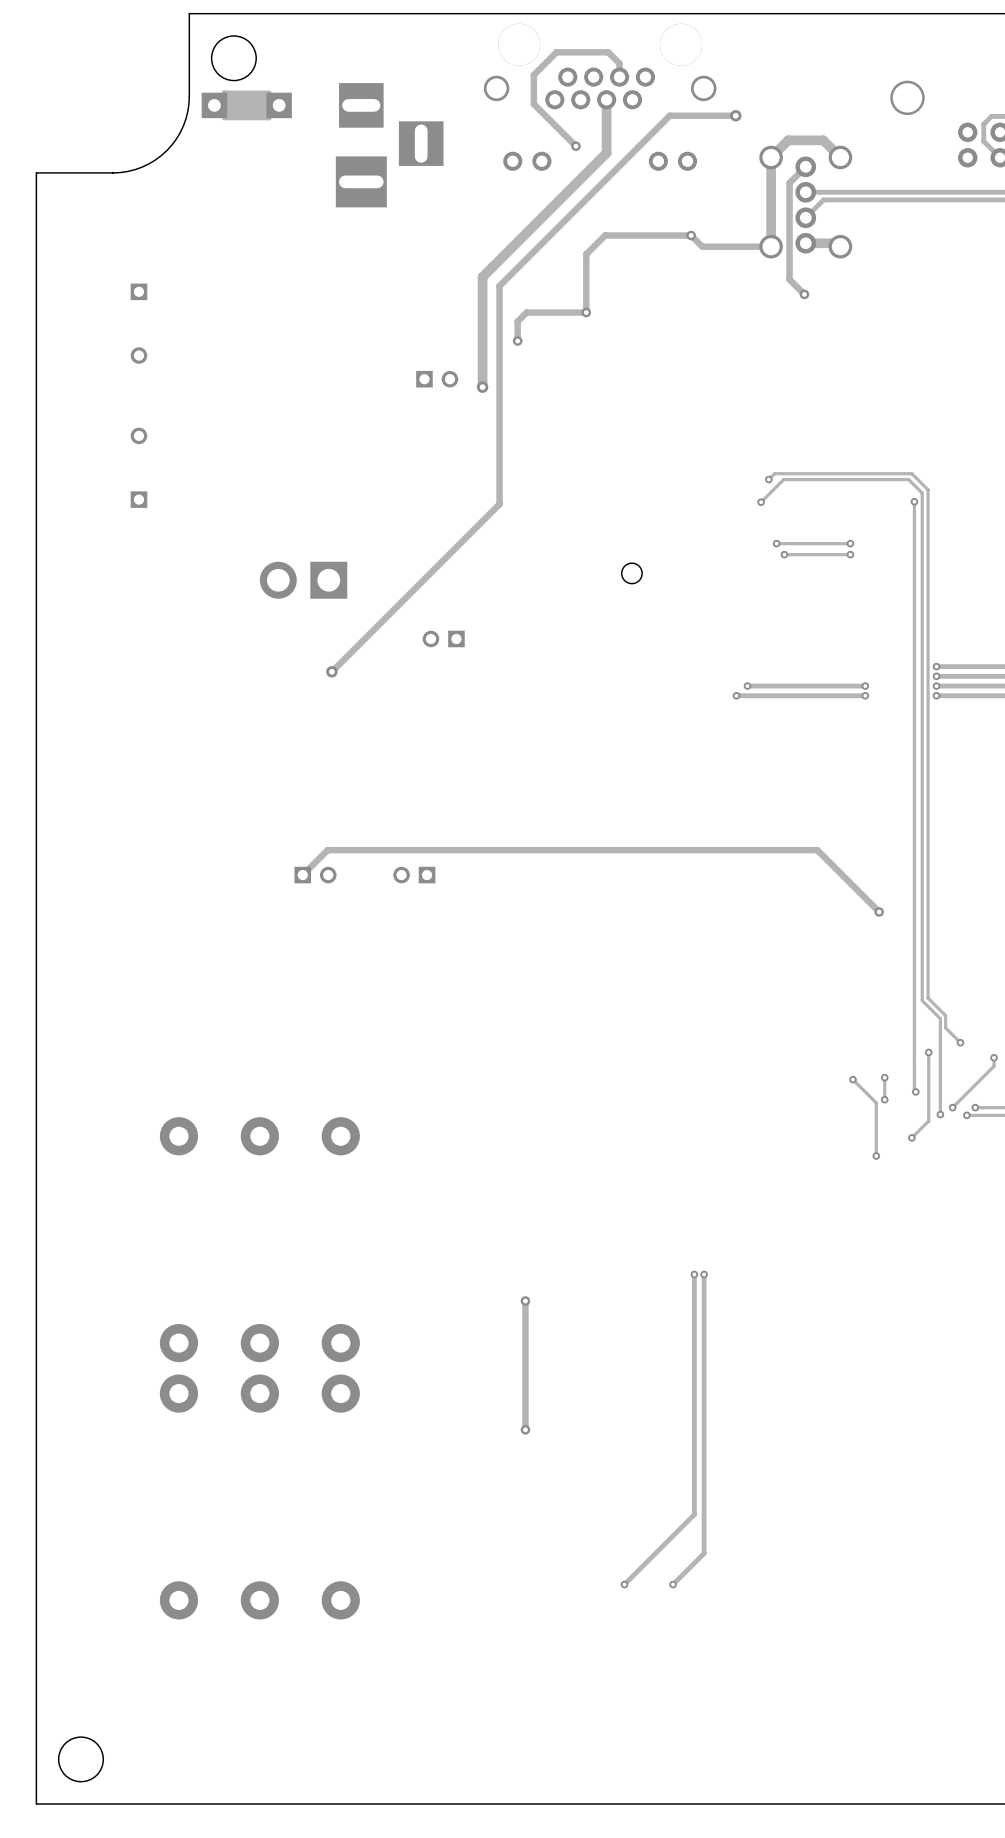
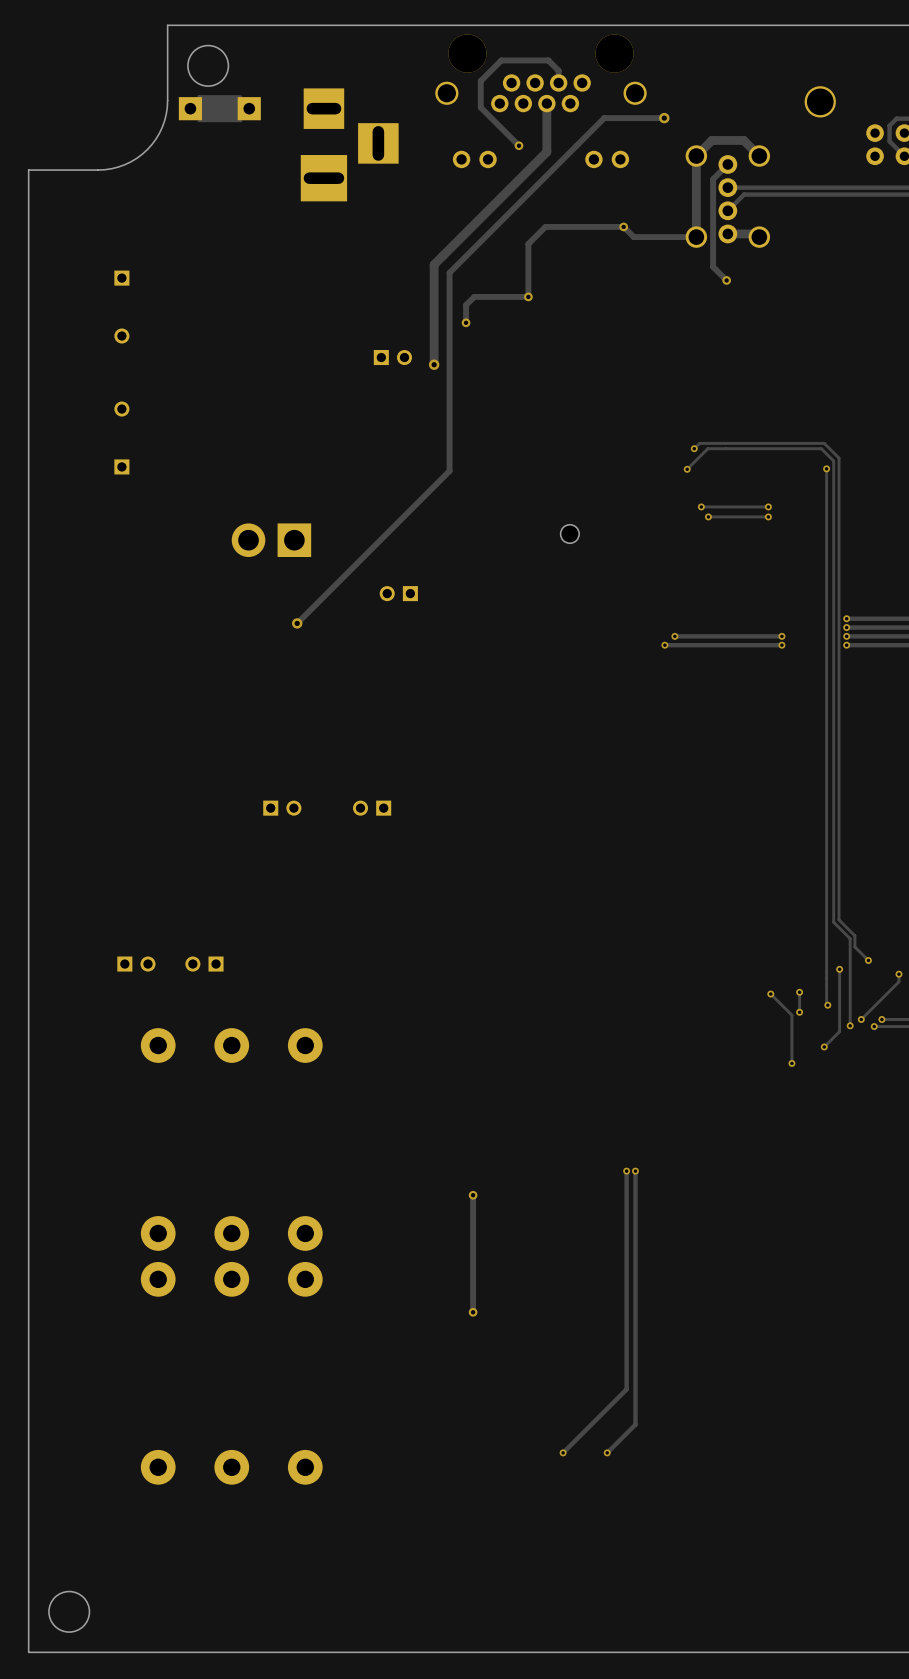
track: (302, 875) (327, 850) (817, 850) (879, 911) -> none
via: (879, 911) -> none
part: none -> (136, 964)
part: none -> (204, 964)

